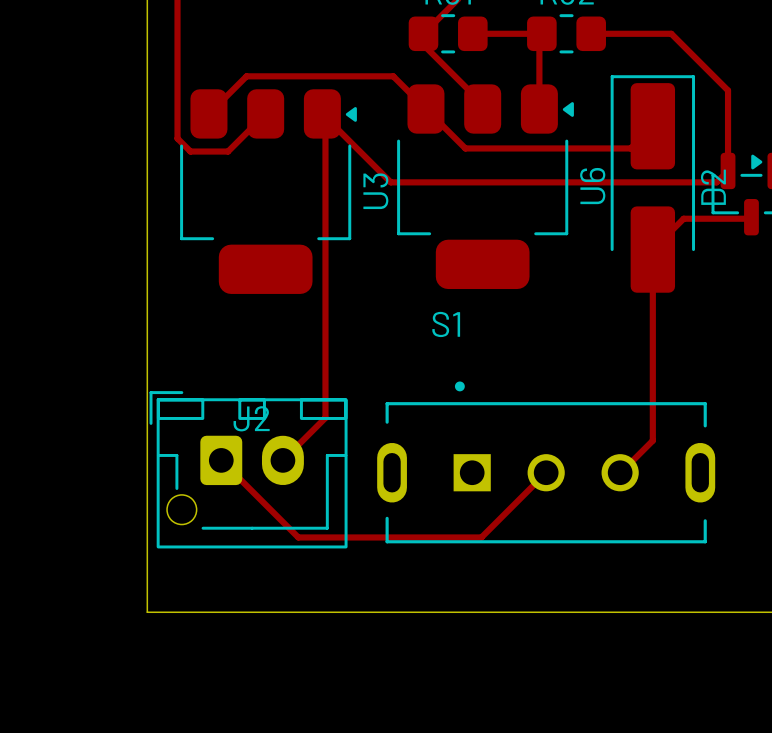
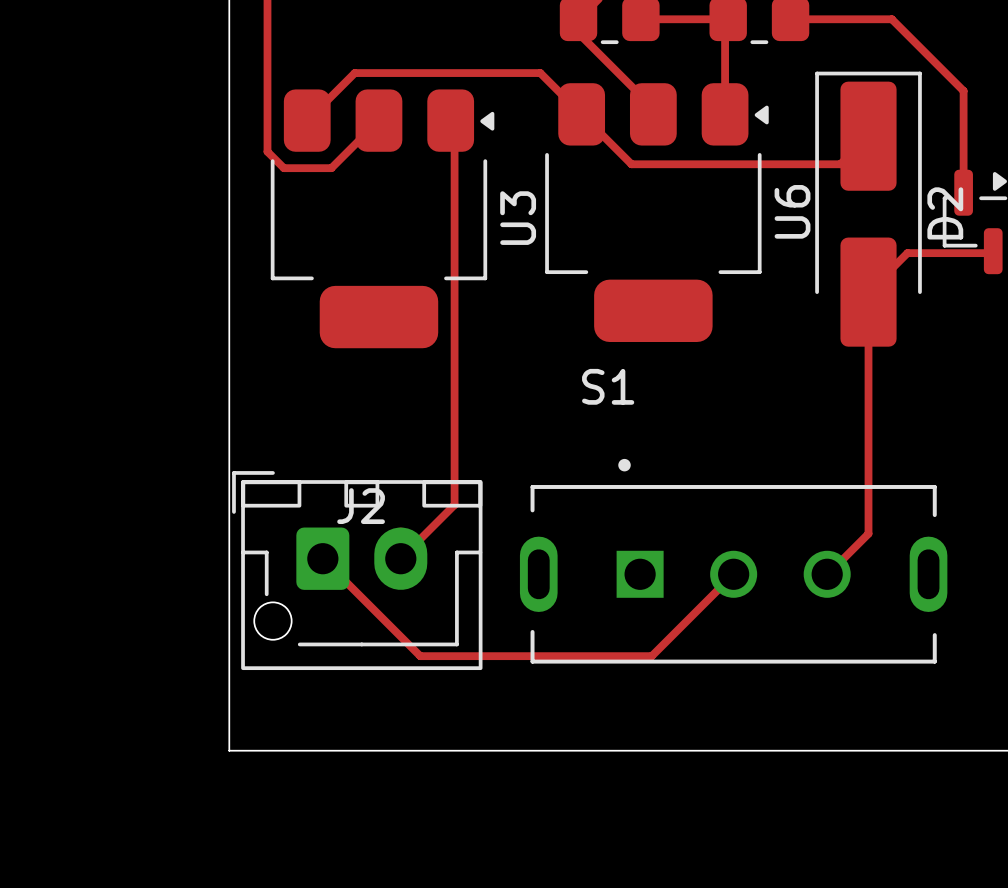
top track: (325, 117) (390, 182) (716, 182) (728, 170) -> none

